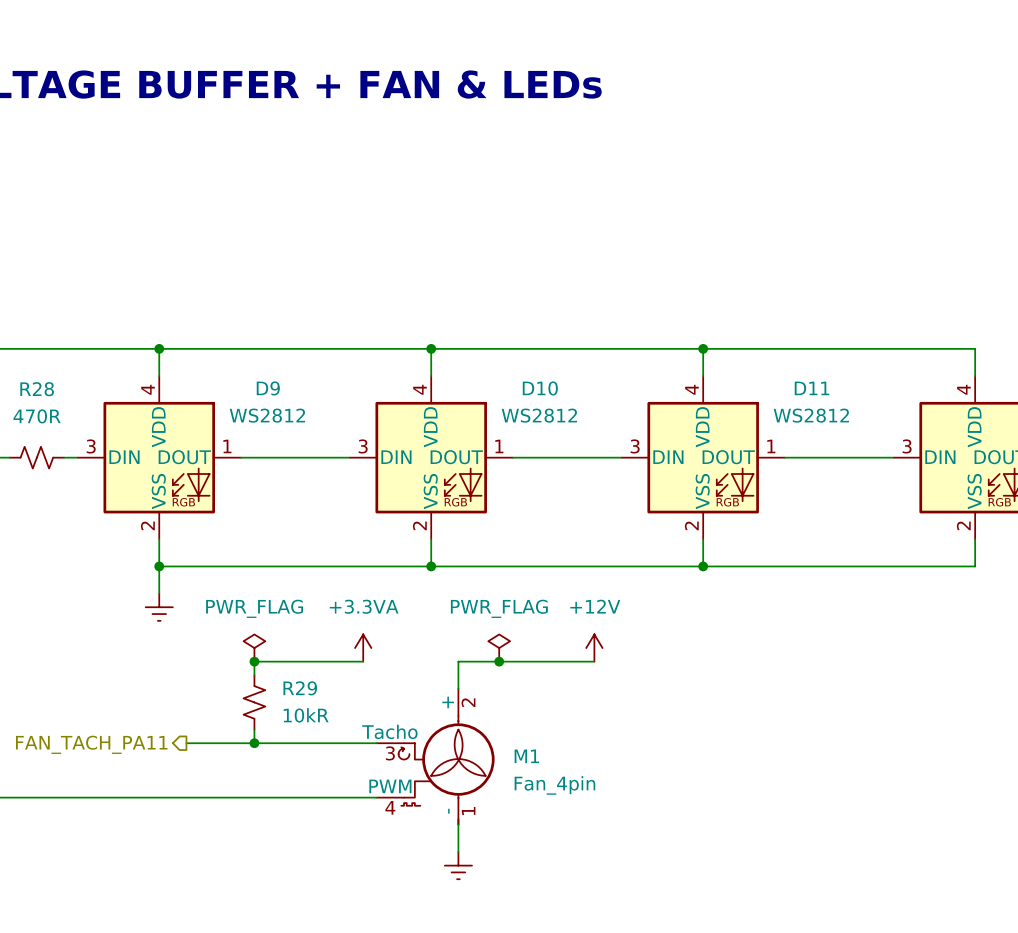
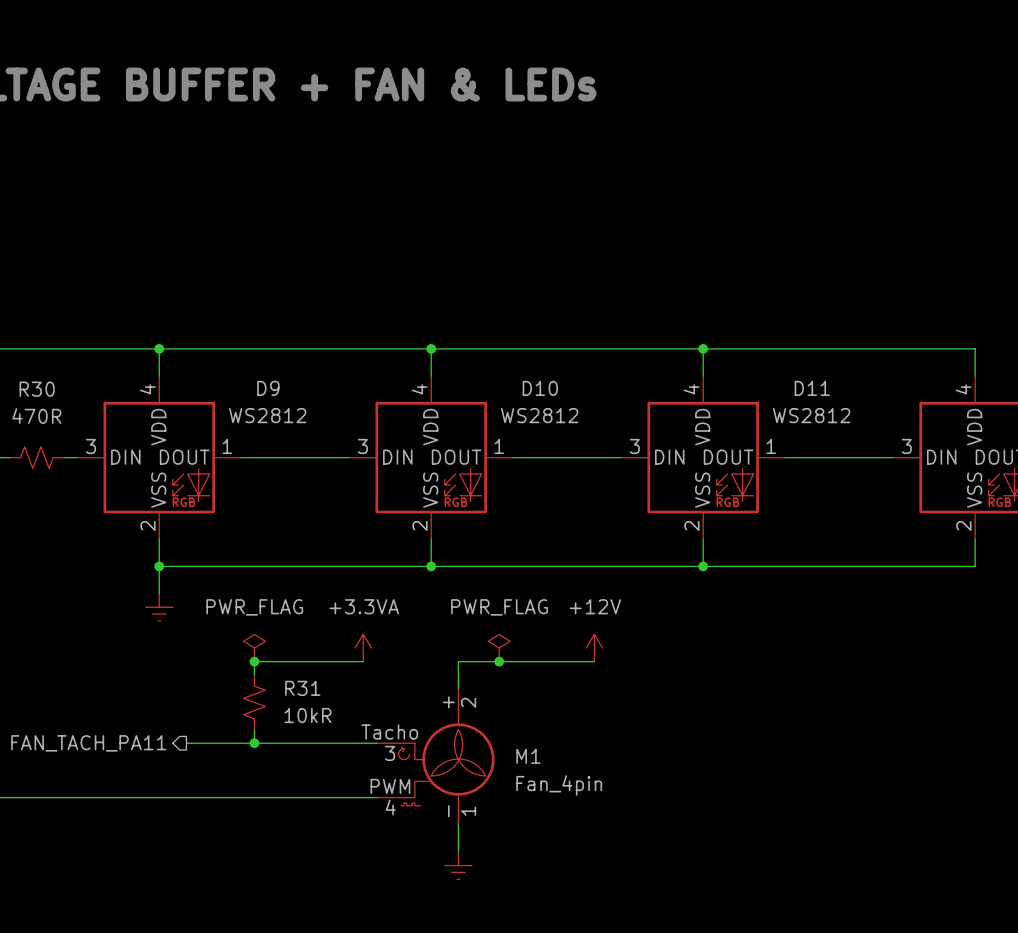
R28 name: R28 (37, 389) -> R30 (37, 389)
R29 name: R29 (300, 688) -> R31 (302, 688)

